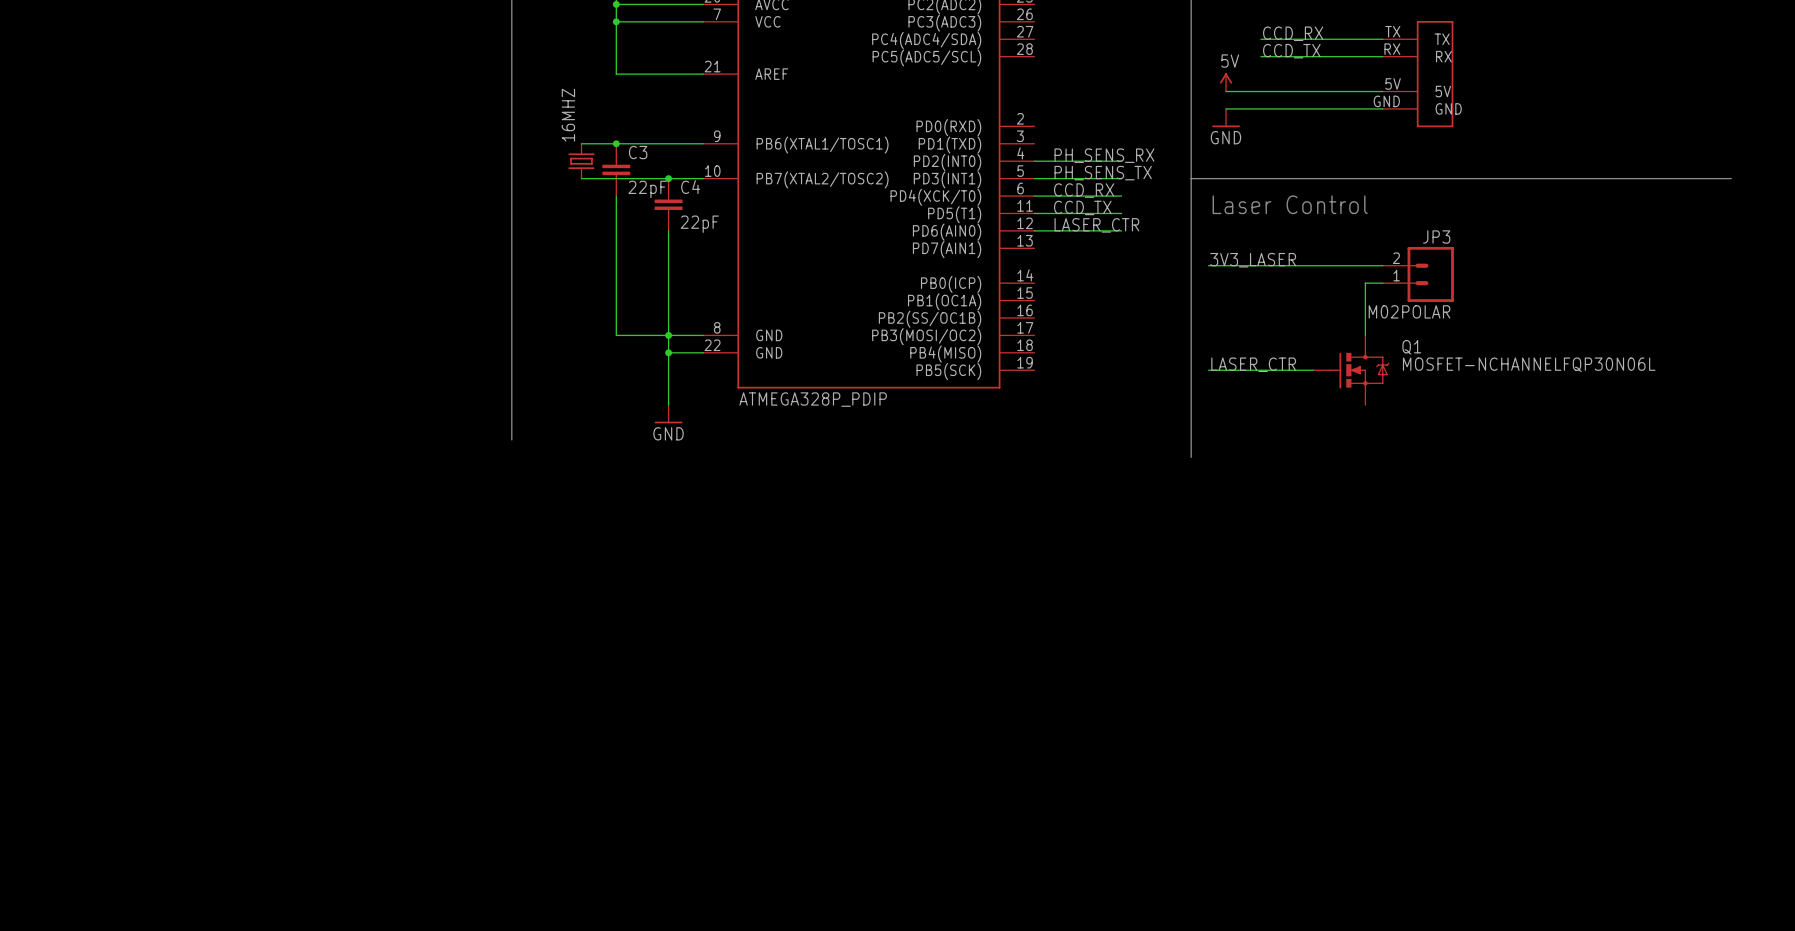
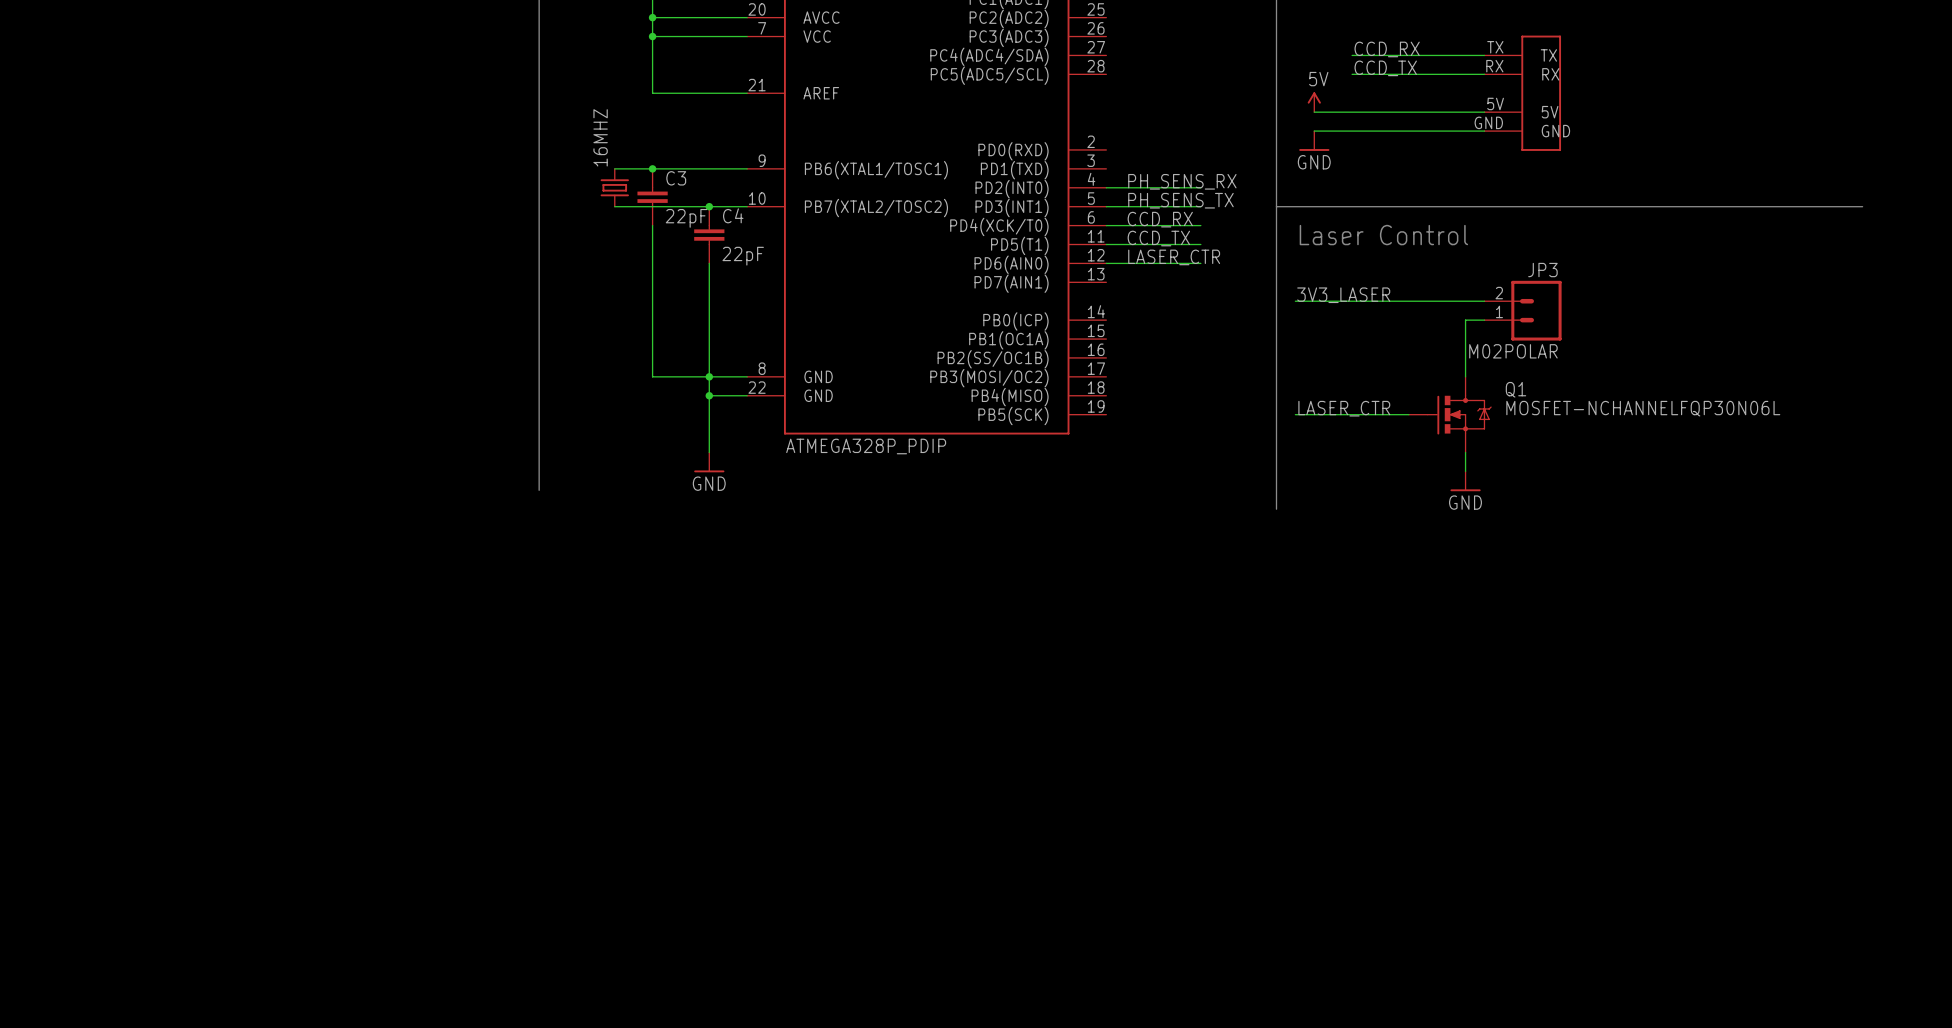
wire: none -> (1465, 452) (1465, 471)
power symbol: none -> GND (1465, 481)

